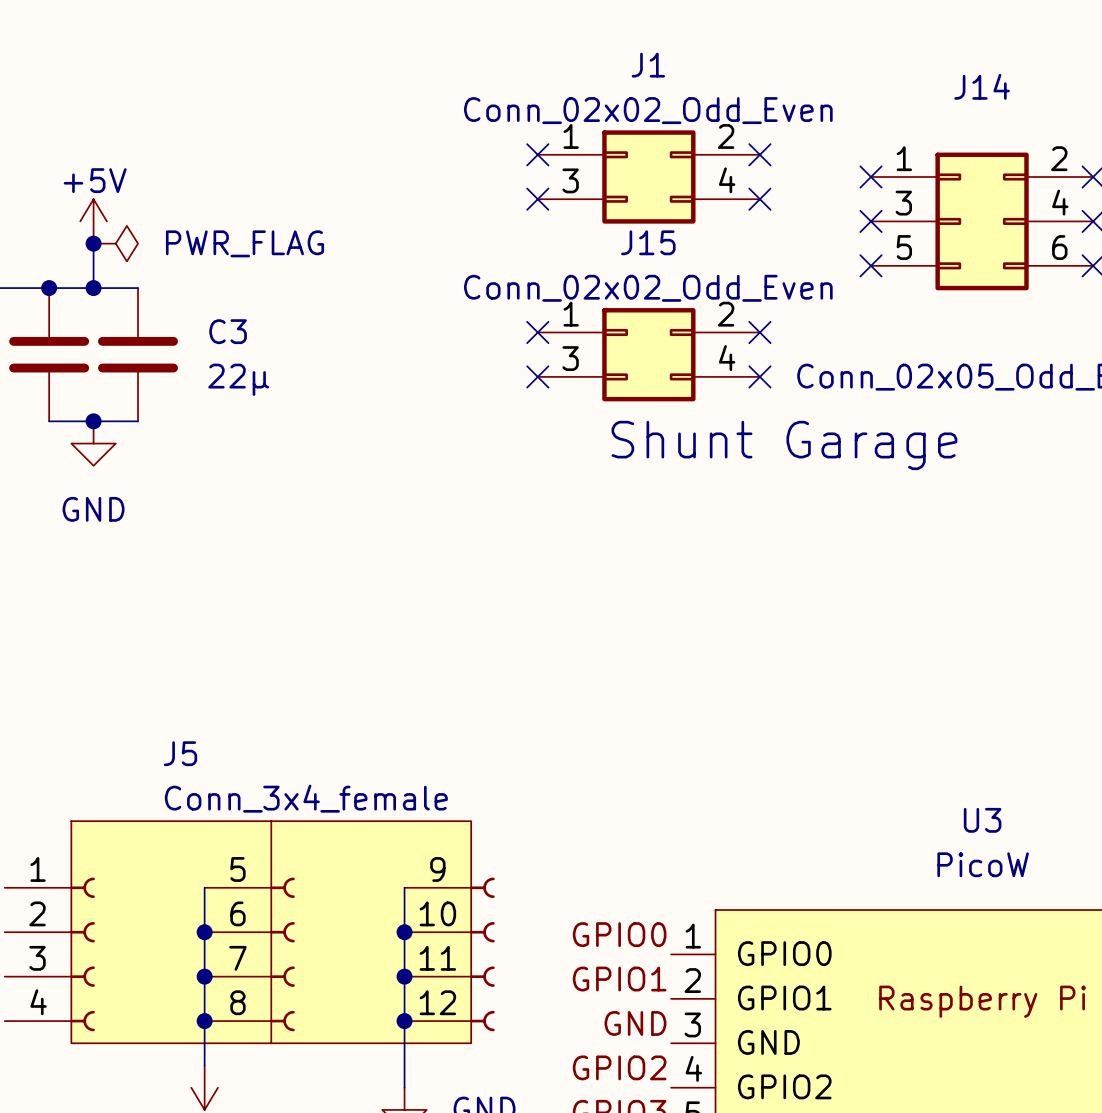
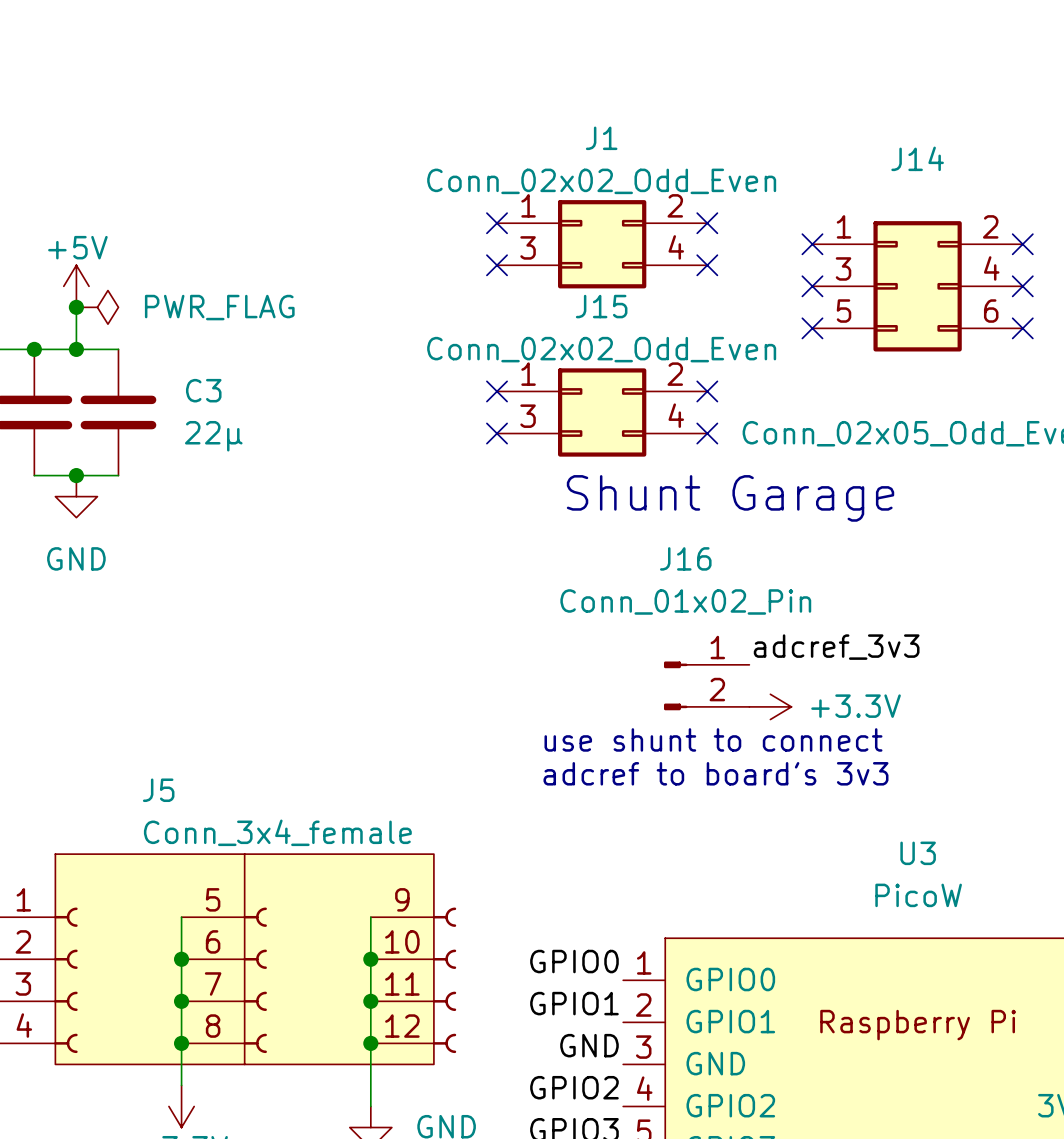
label: none -> adcref_3v3 (836, 647)
J16: none -> Conn_01x02_Pin (706, 685)
power symbol: none -> +3.3V (770, 706)
text: none -> use shunt to connect (713, 739)
text: none -> adcref to board's 3v3 (715, 773)

